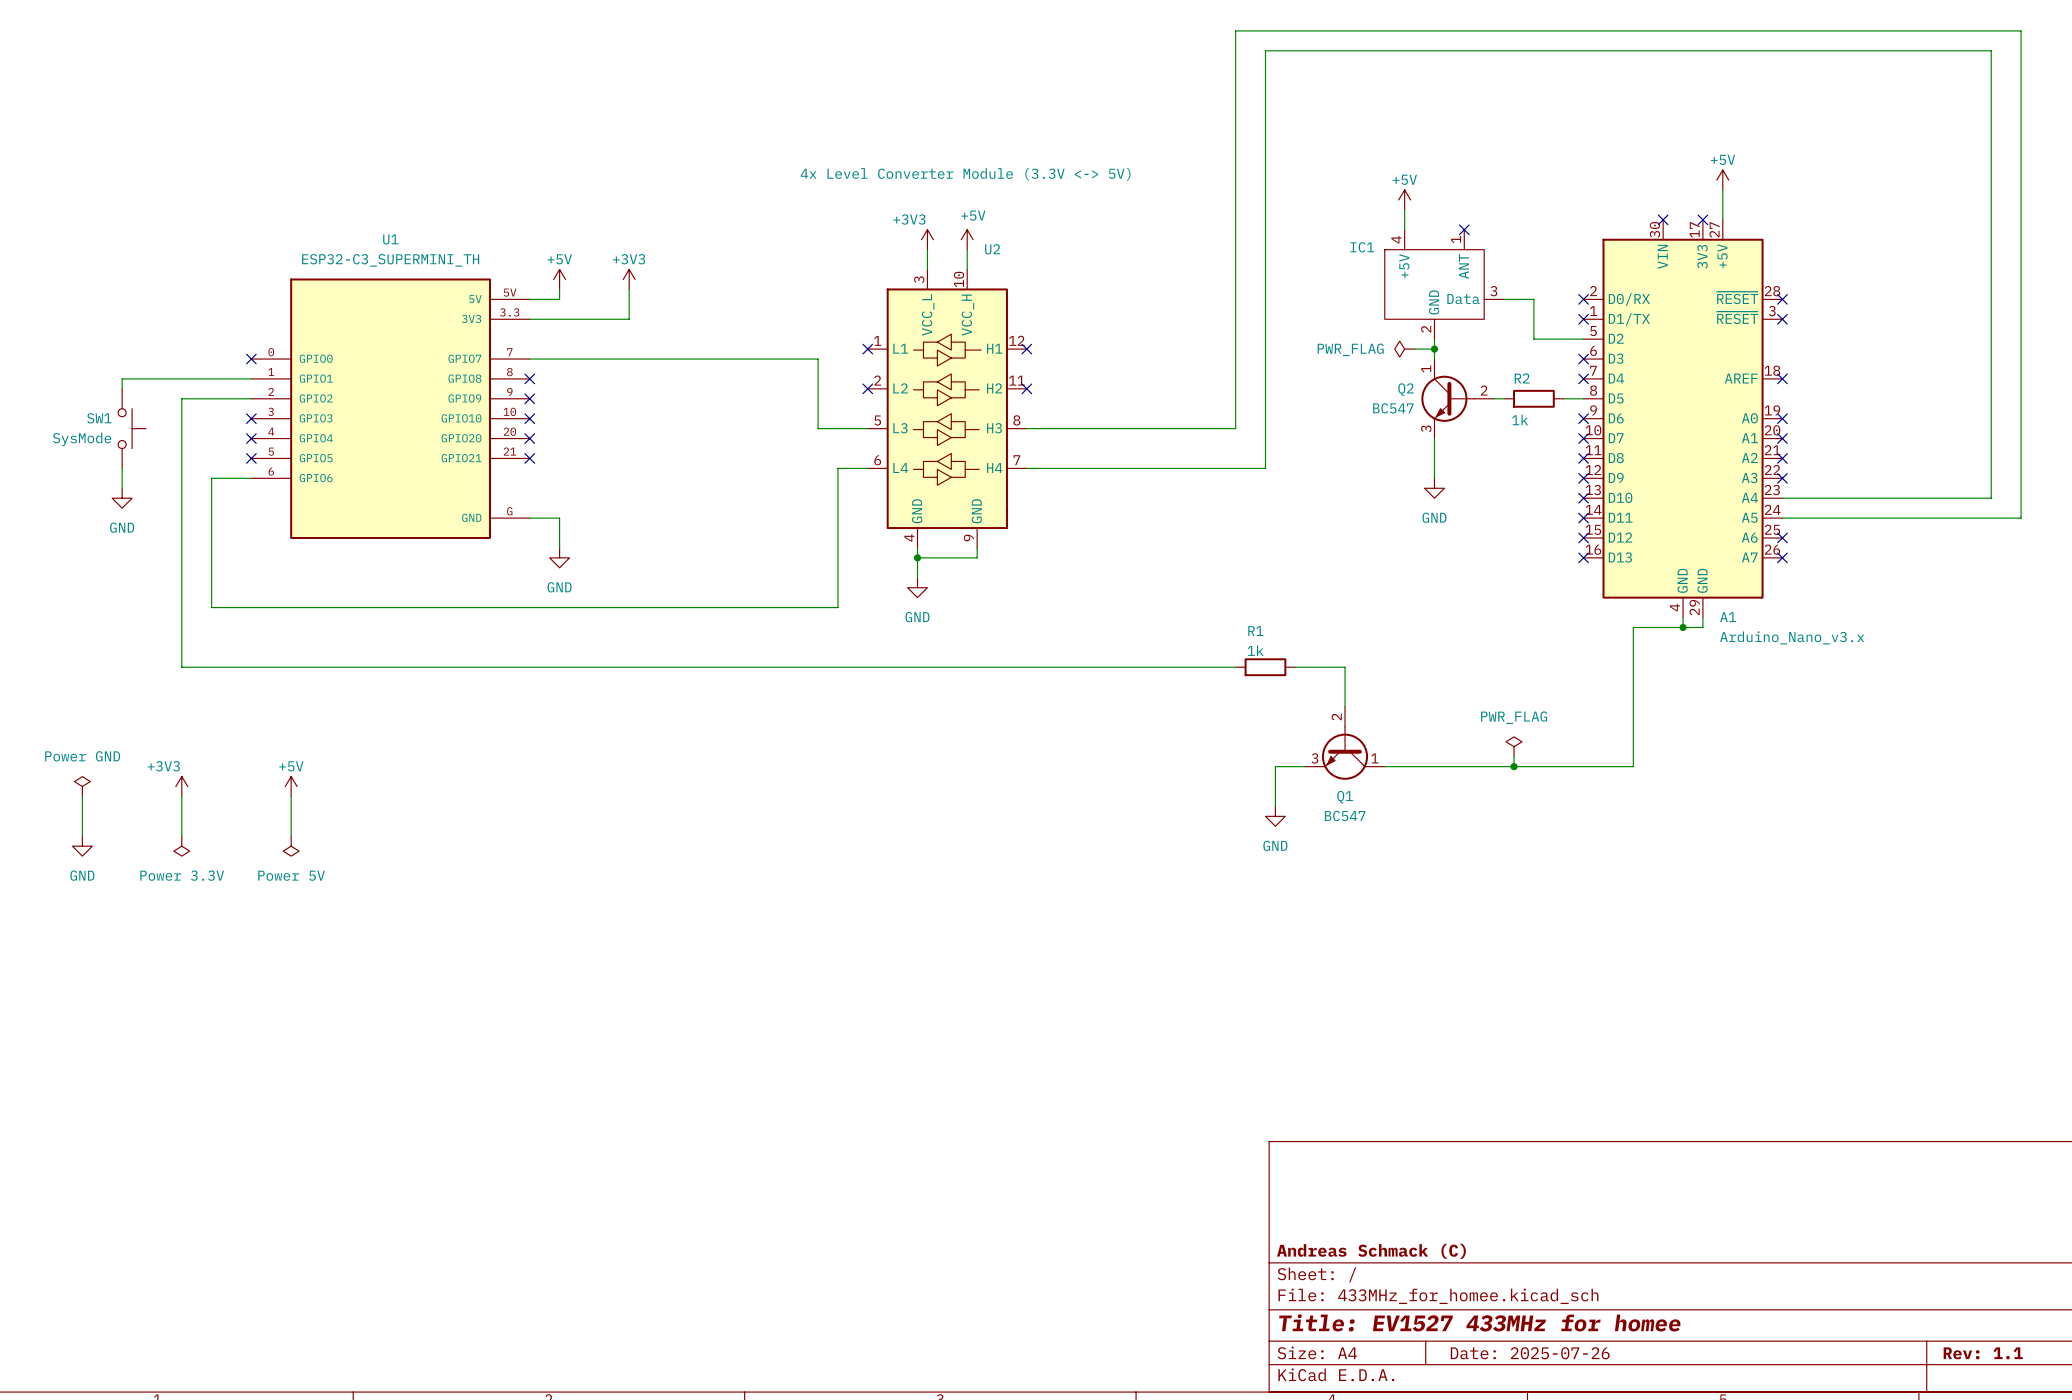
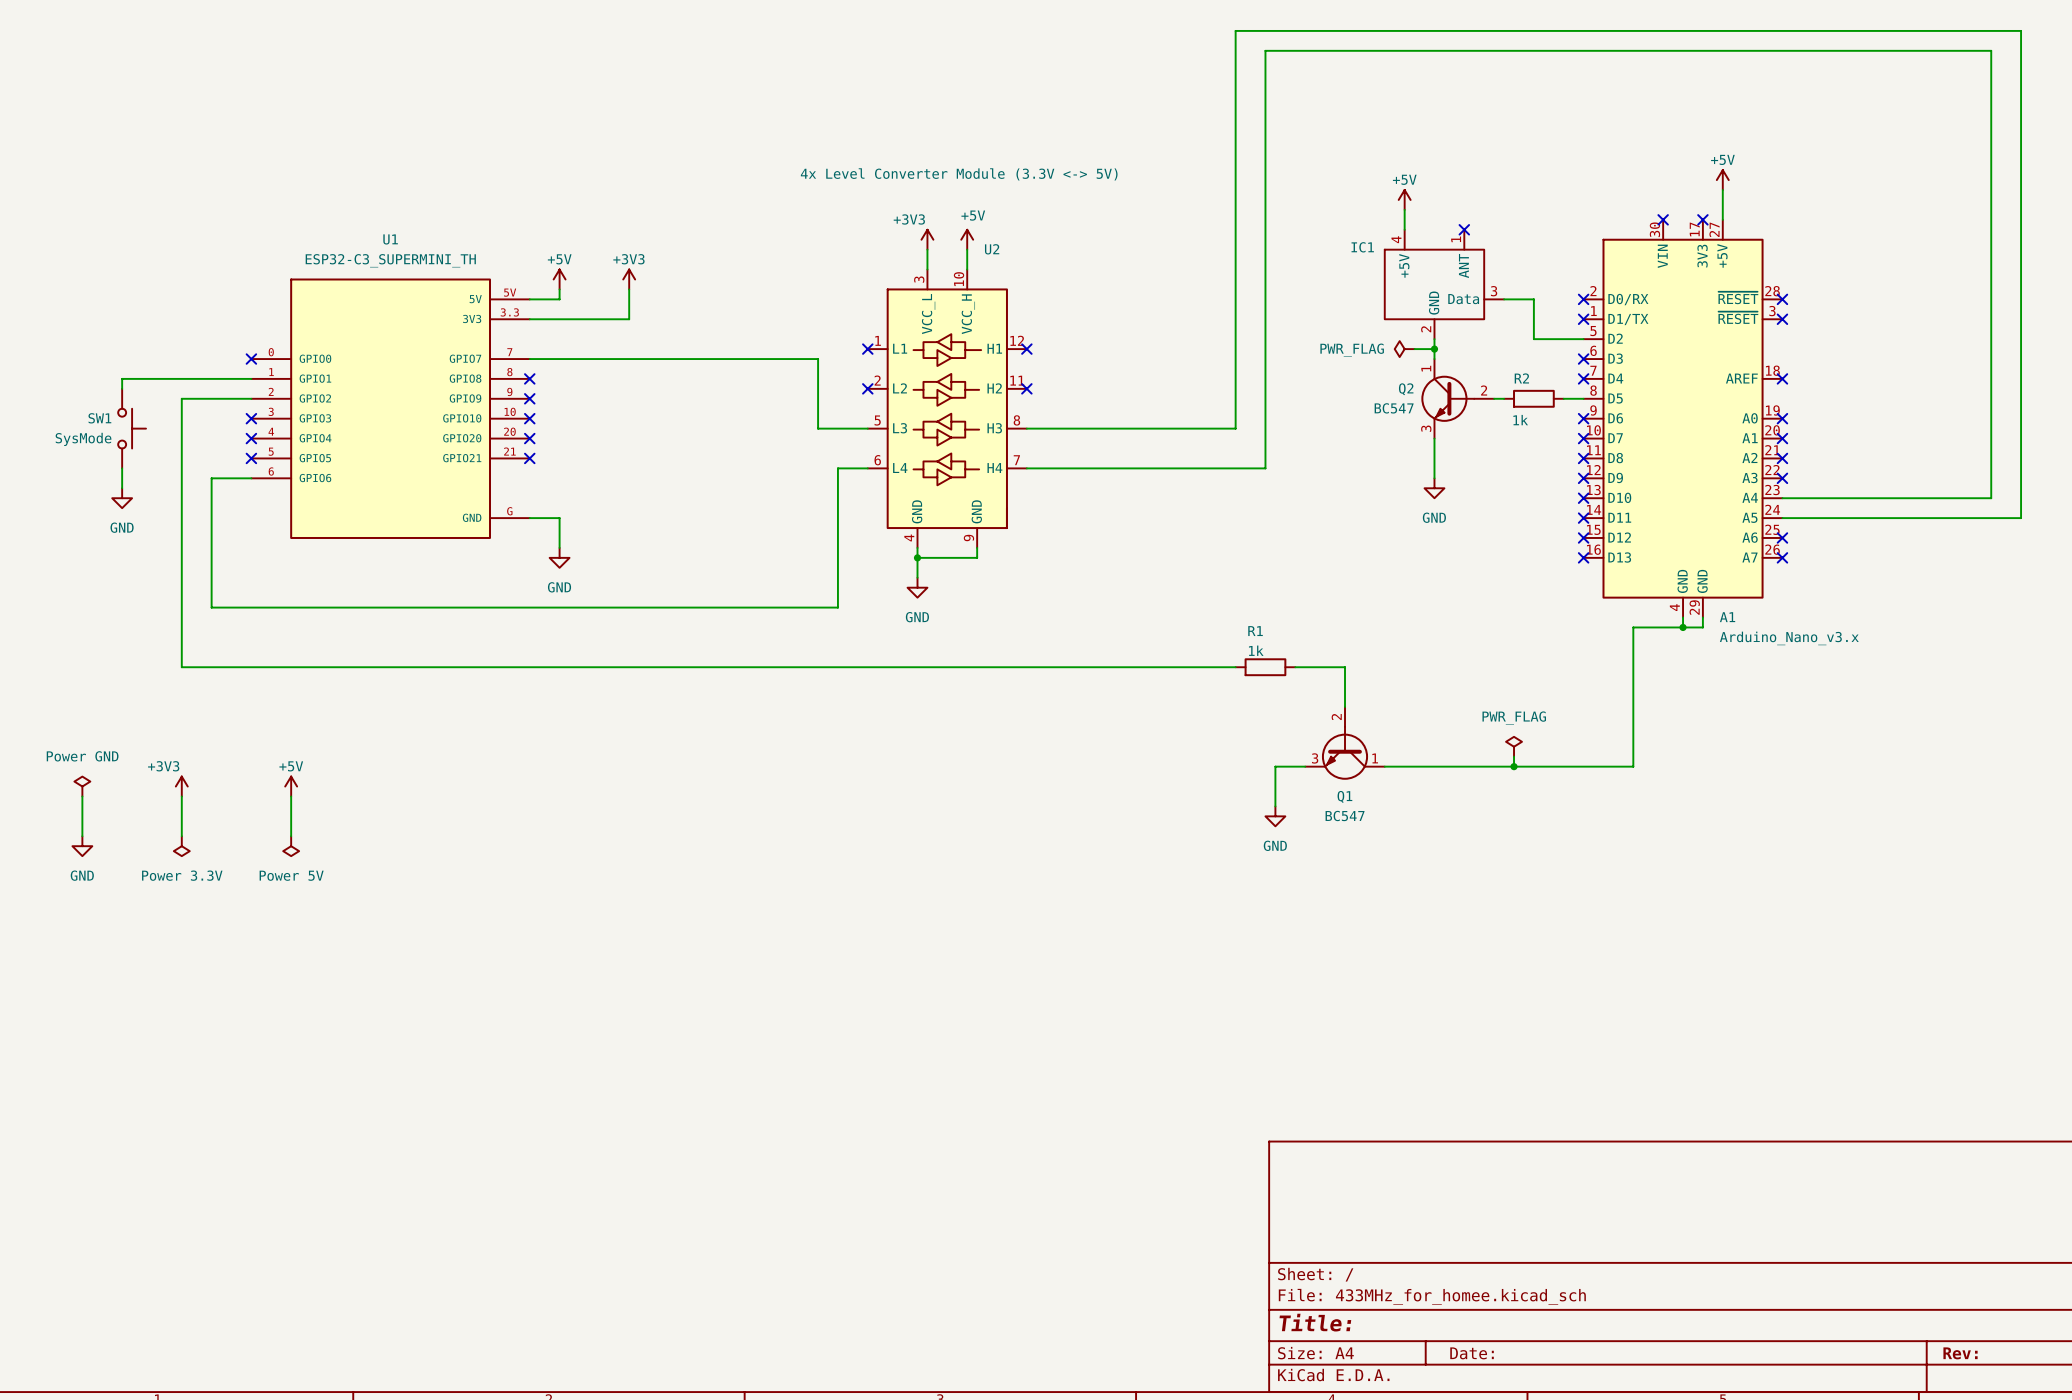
title block: Andreas Schmack (C) (1371, 1251) -> none
title block: Title: EV1527 433MHz for homee (1479, 1322) -> Title: (1315, 1322)
title block: Date: 2025-07-26 (1530, 1353) -> Date: (1472, 1353)
title block: Rev: 1.1 (1983, 1353) -> Rev: (1960, 1353)

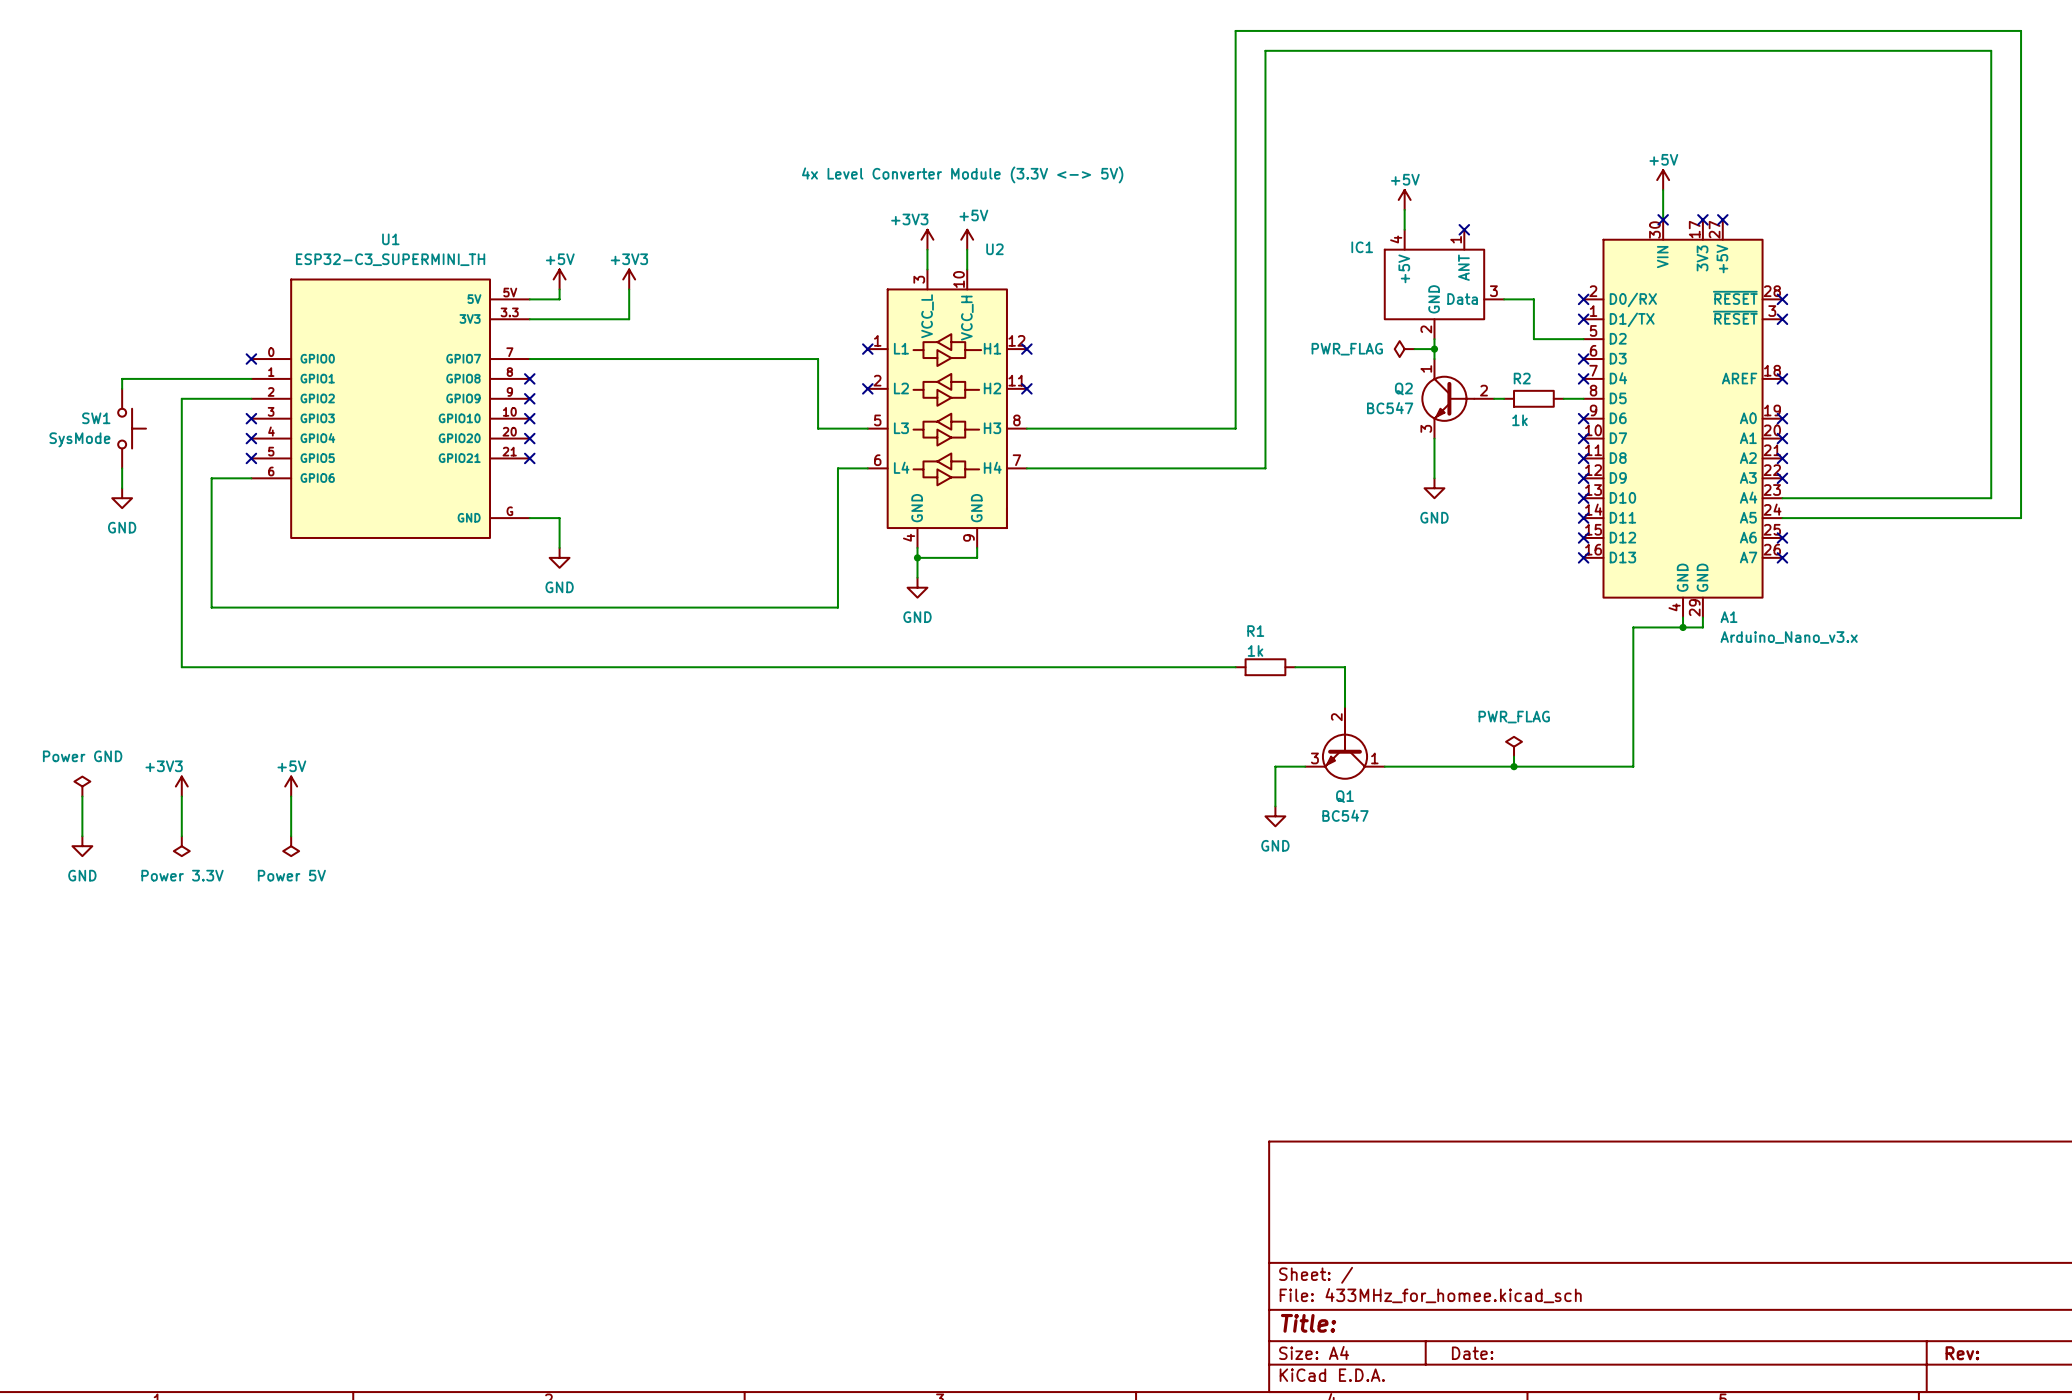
power symbol position: +5V (1722, 180) -> +5V (1663, 180)
wire: (1722, 190) (1722, 219) -> (1663, 190) (1663, 219)
no-connect mark: none -> (1722, 219)

